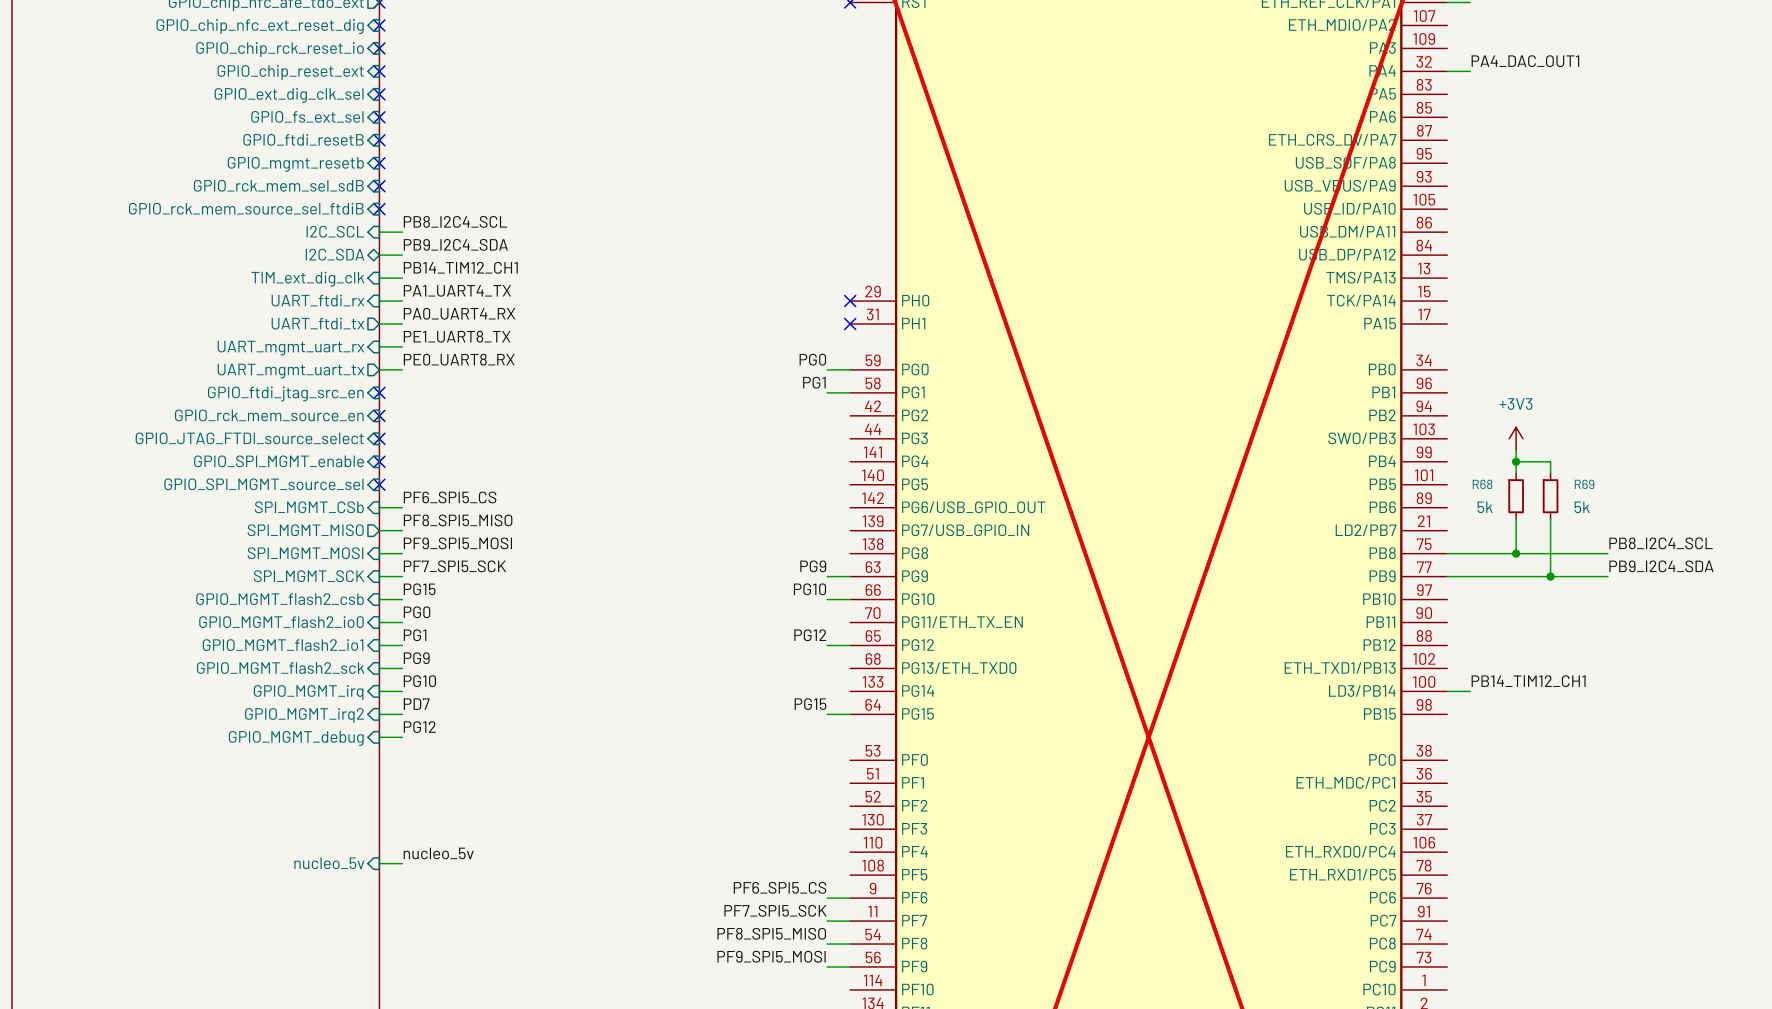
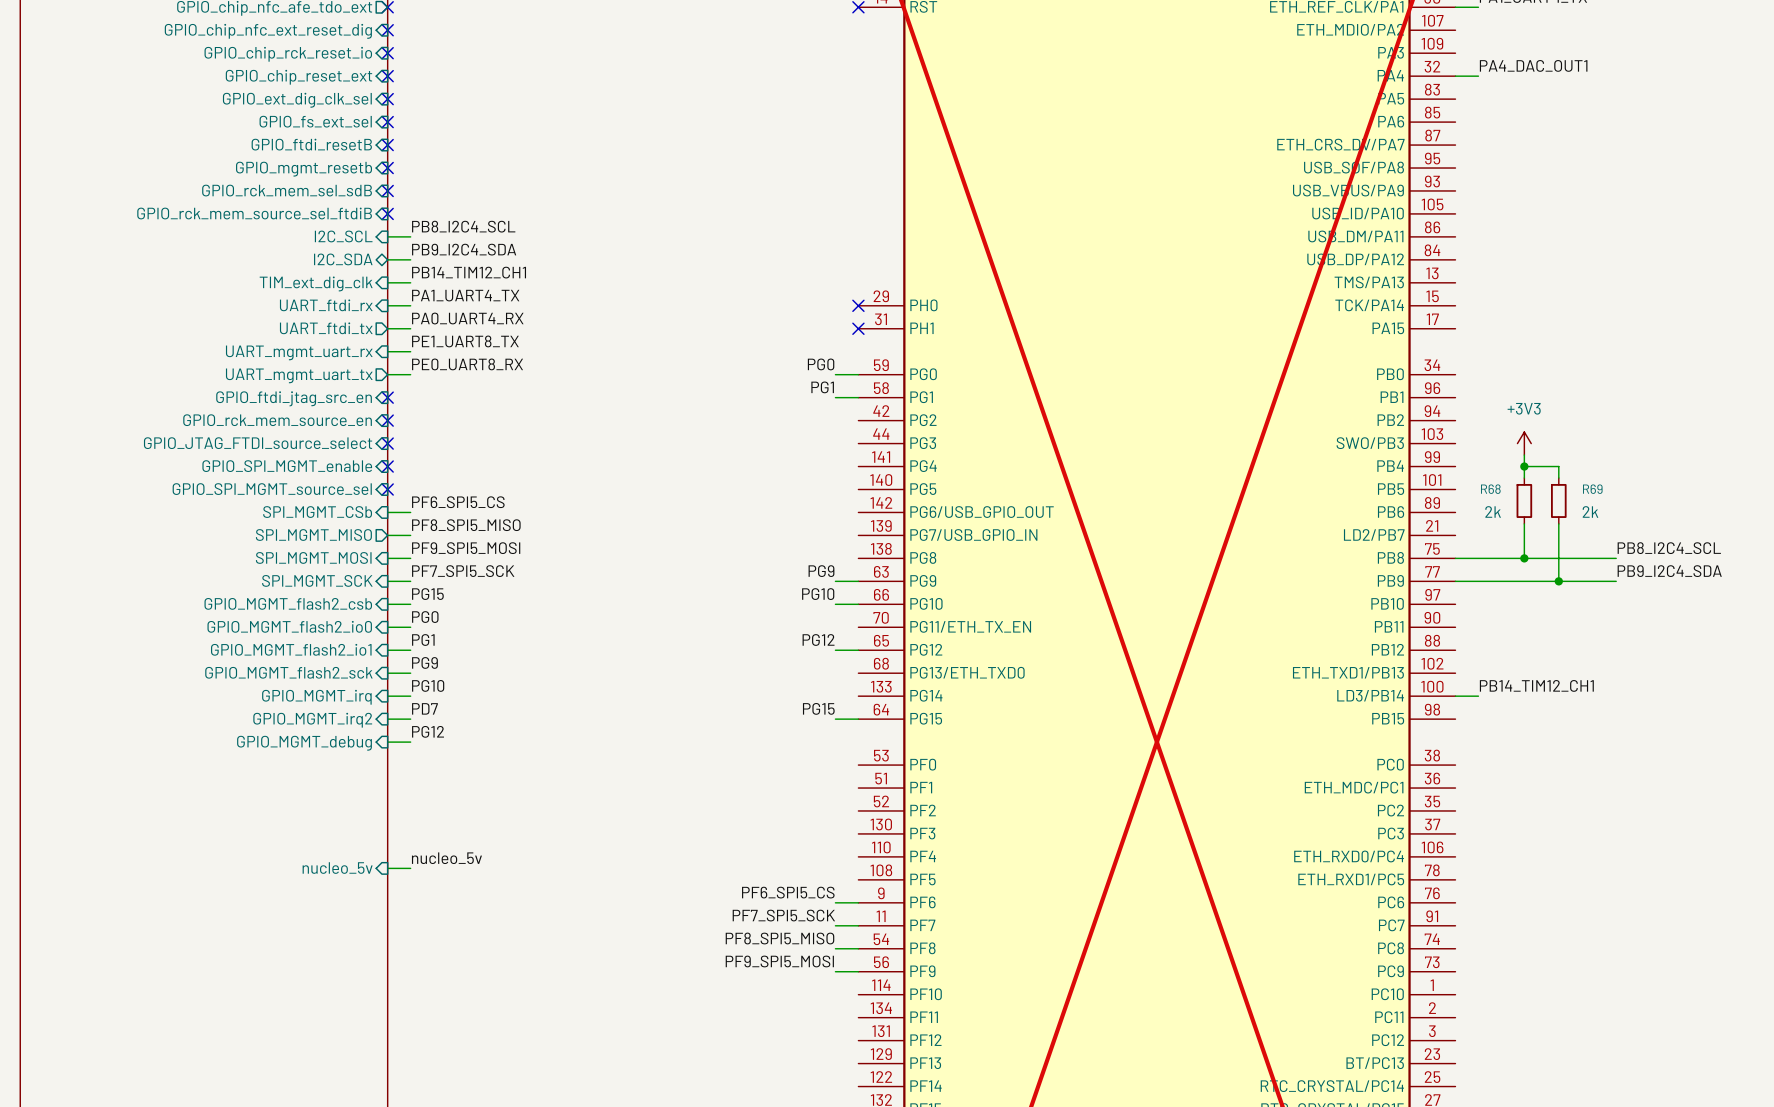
R68 value: 5k (1485, 507) -> 2k (1493, 511)
R69 value: 5k (1582, 507) -> 2k (1590, 511)

